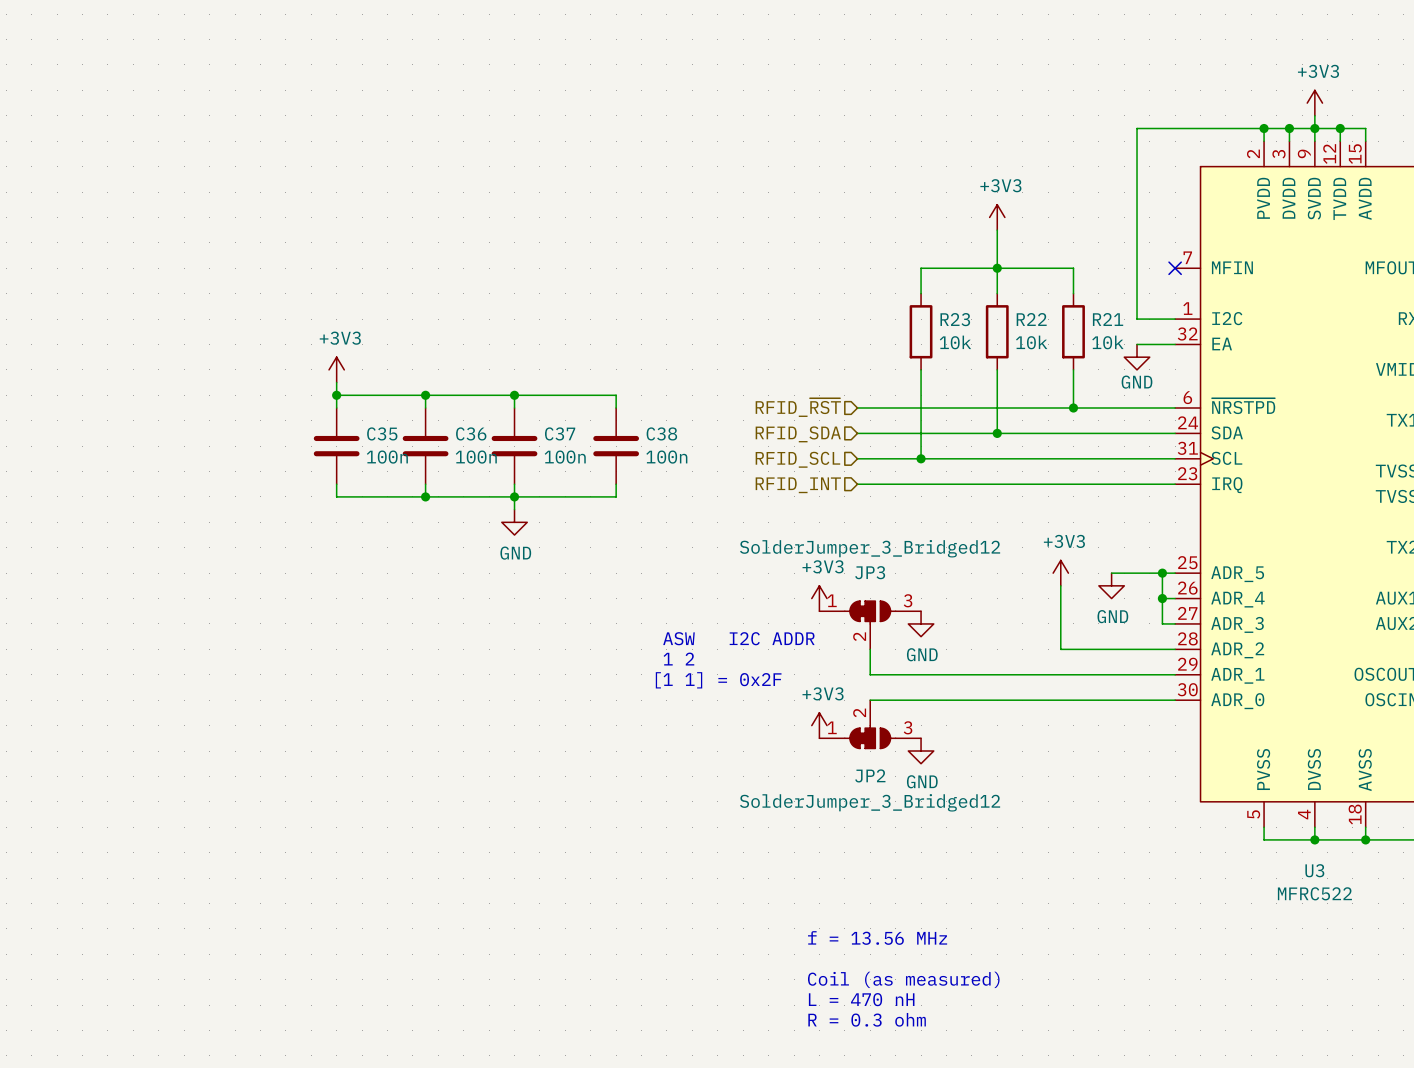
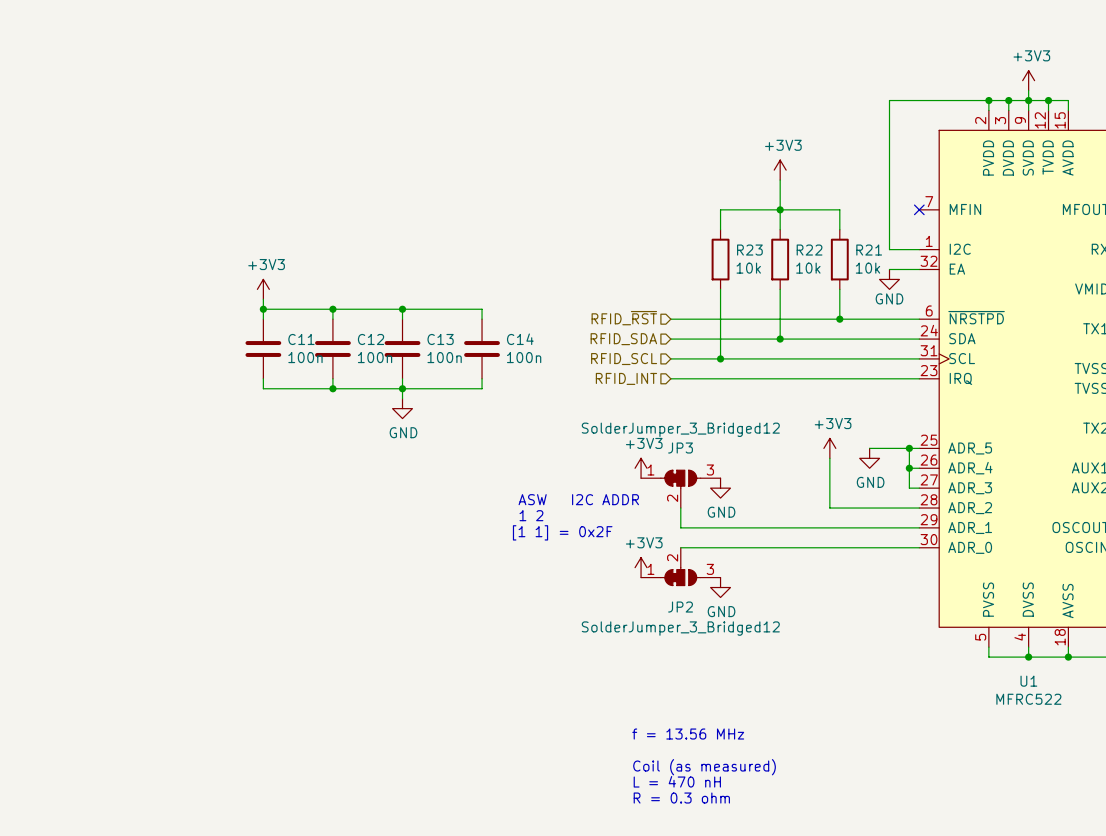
C35 name: C35 (382, 433) -> C11 (301, 339)
C36 name: C36 (471, 433) -> C12 (371, 339)
C37 name: C37 (560, 433) -> C13 (440, 339)
C38 name: C38 (661, 433) -> C14 (520, 339)
U3 name: U3 (1314, 870) -> U1 (1028, 681)

